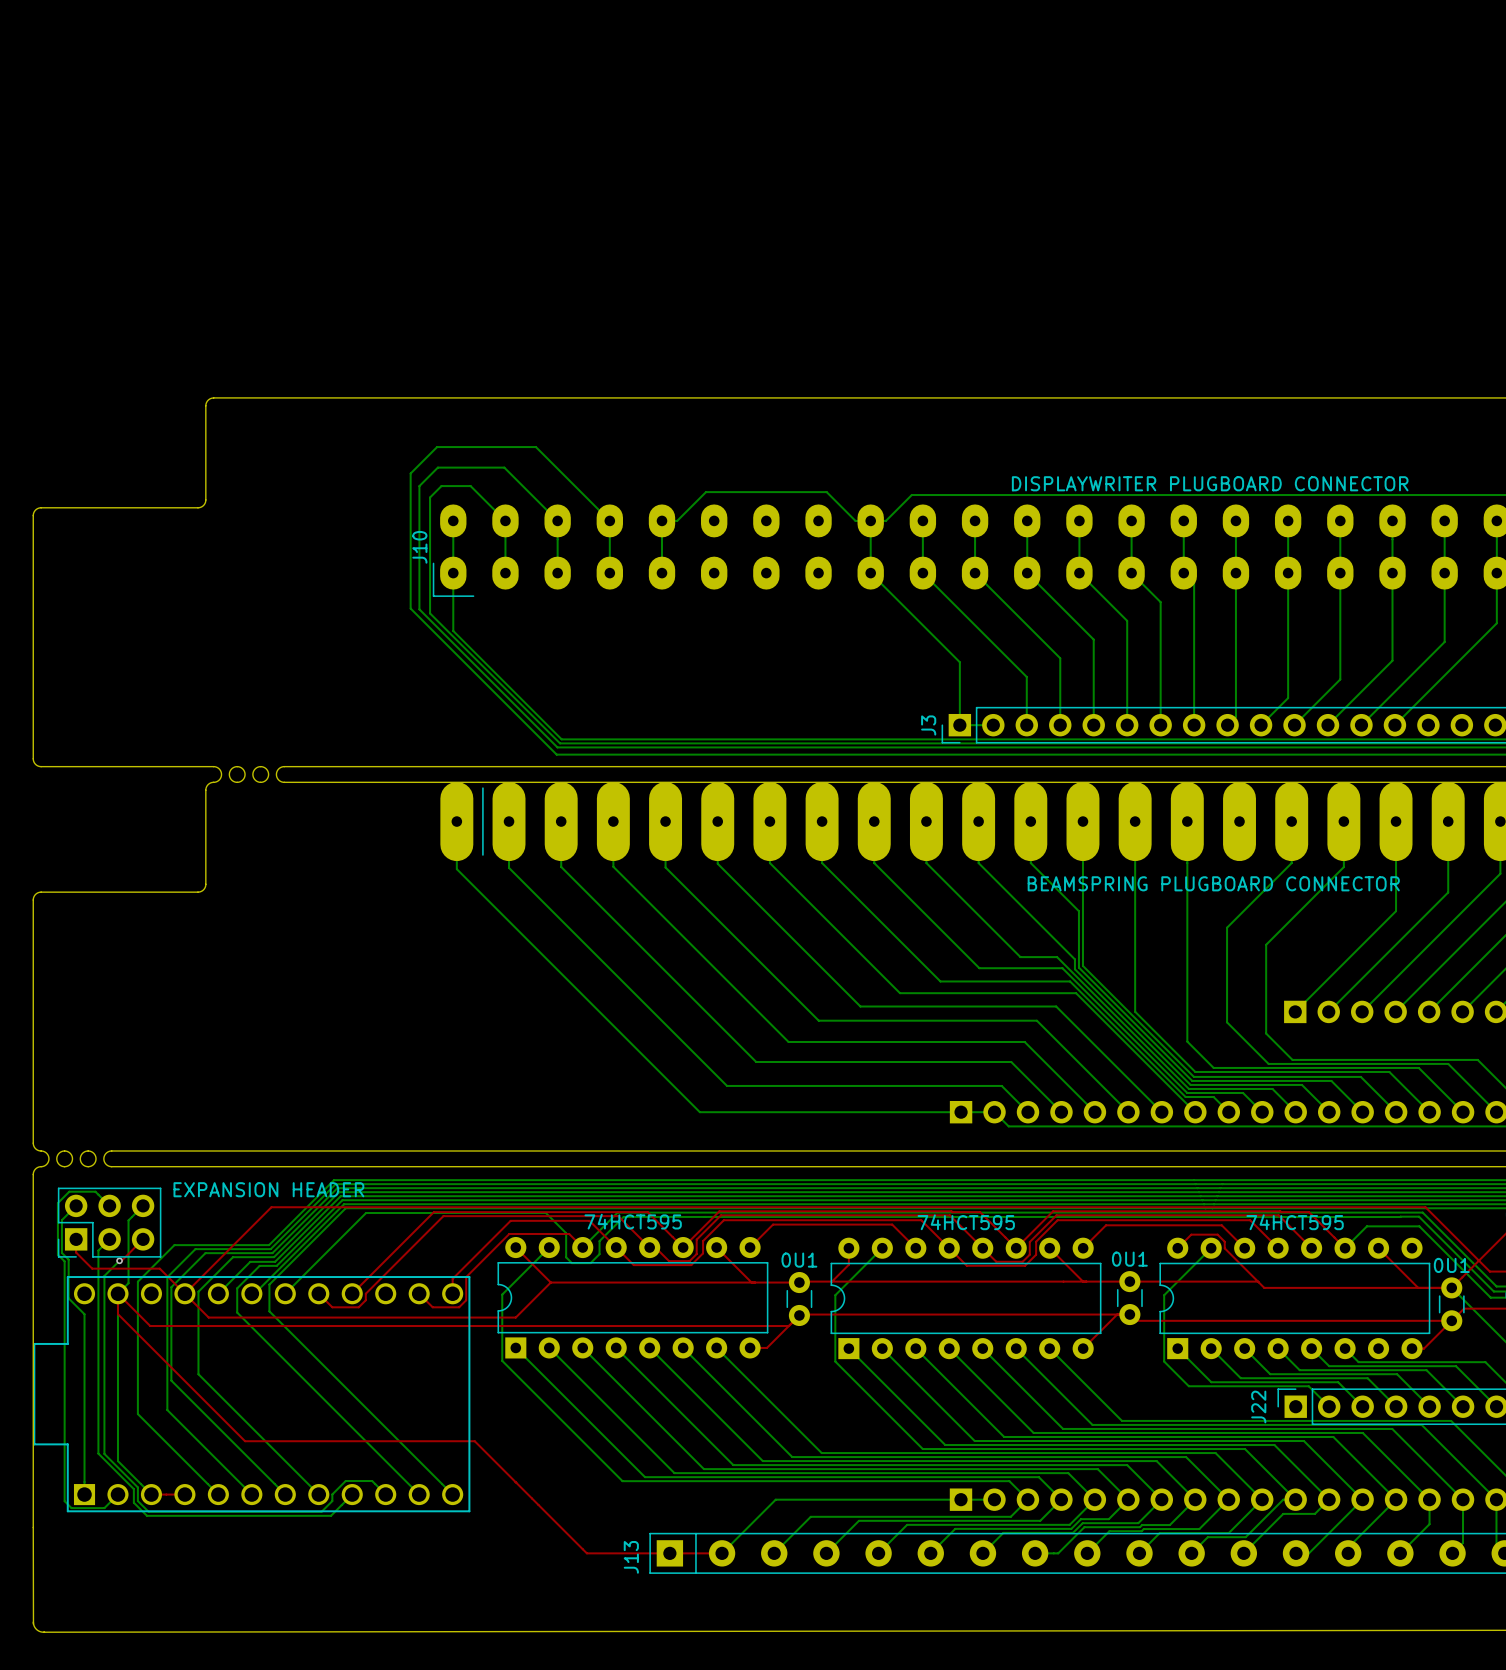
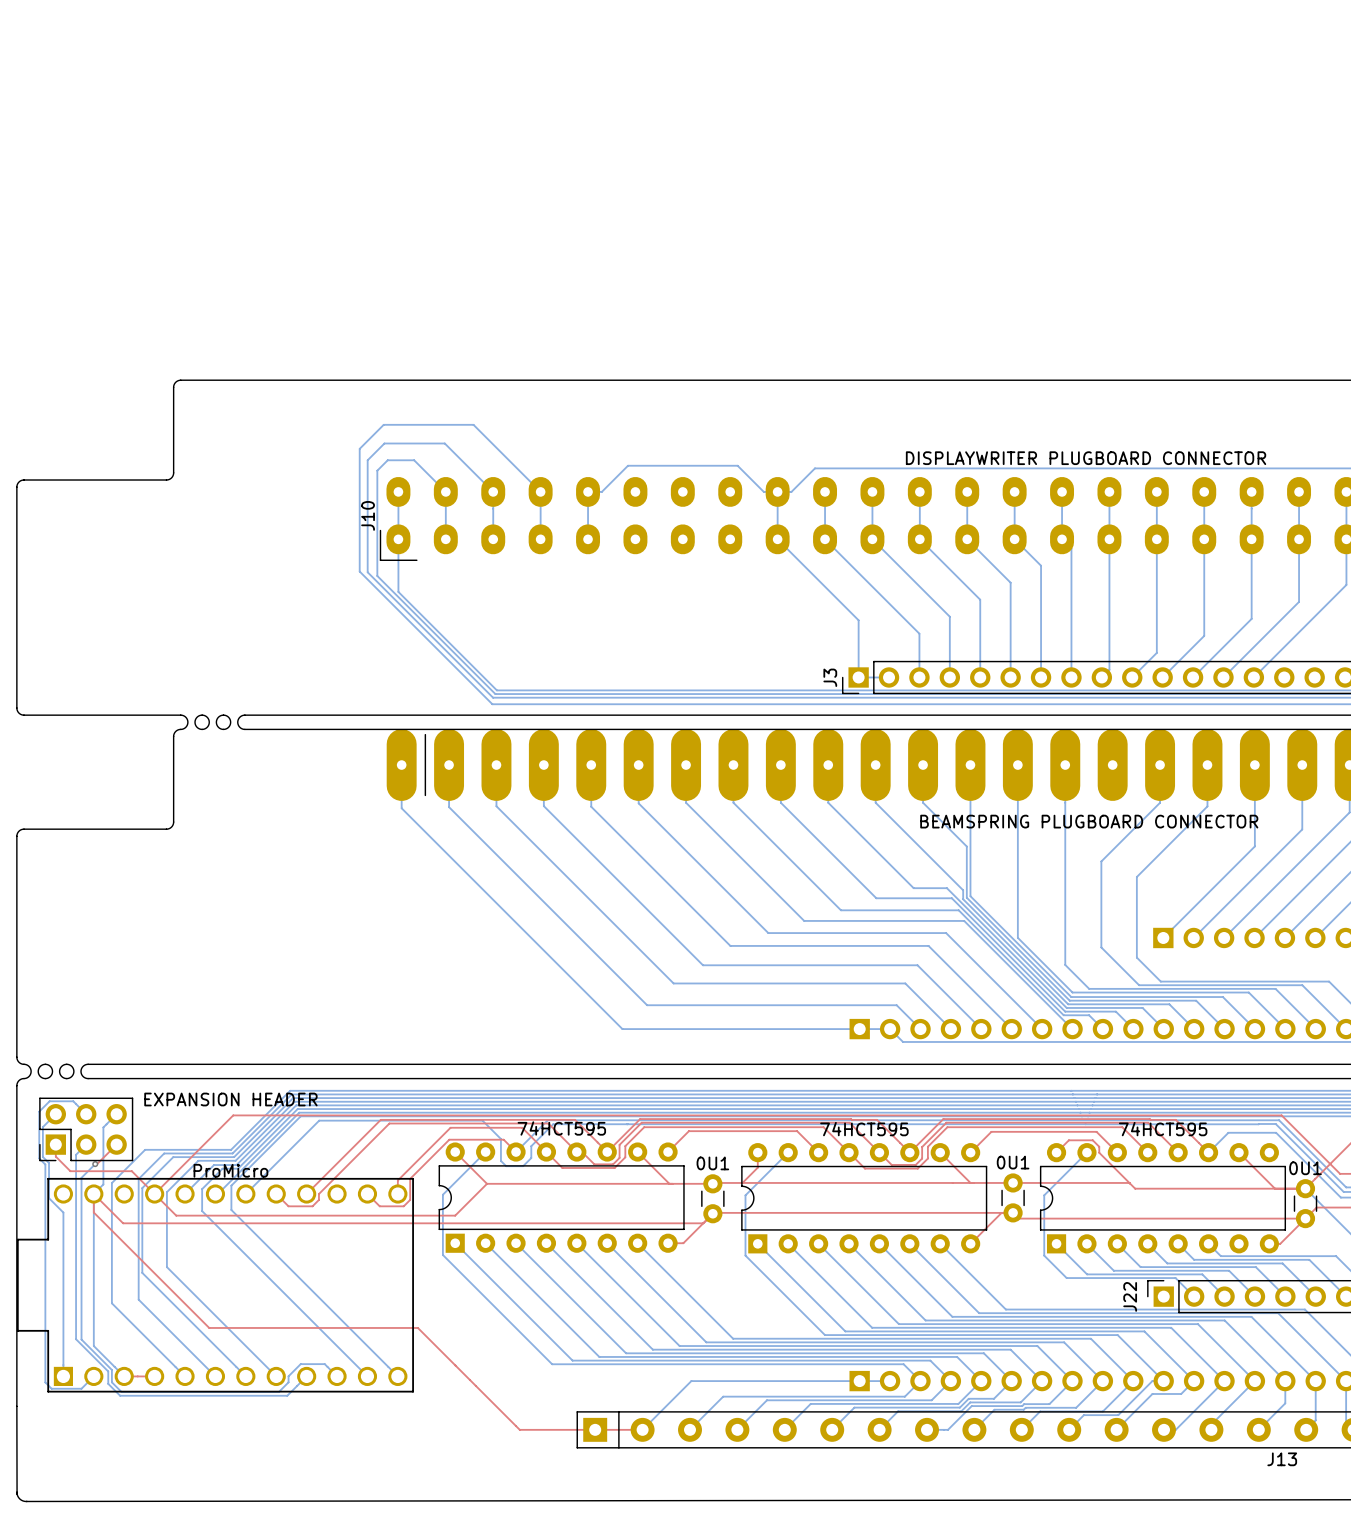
part value: none -> ProMicro (230, 1170)
J13 name rotation: 0° (631, 1557) -> 90° clockwise (1282, 1459)
J13 name position: J13 (631, 1557) -> J13 (1282, 1459)

